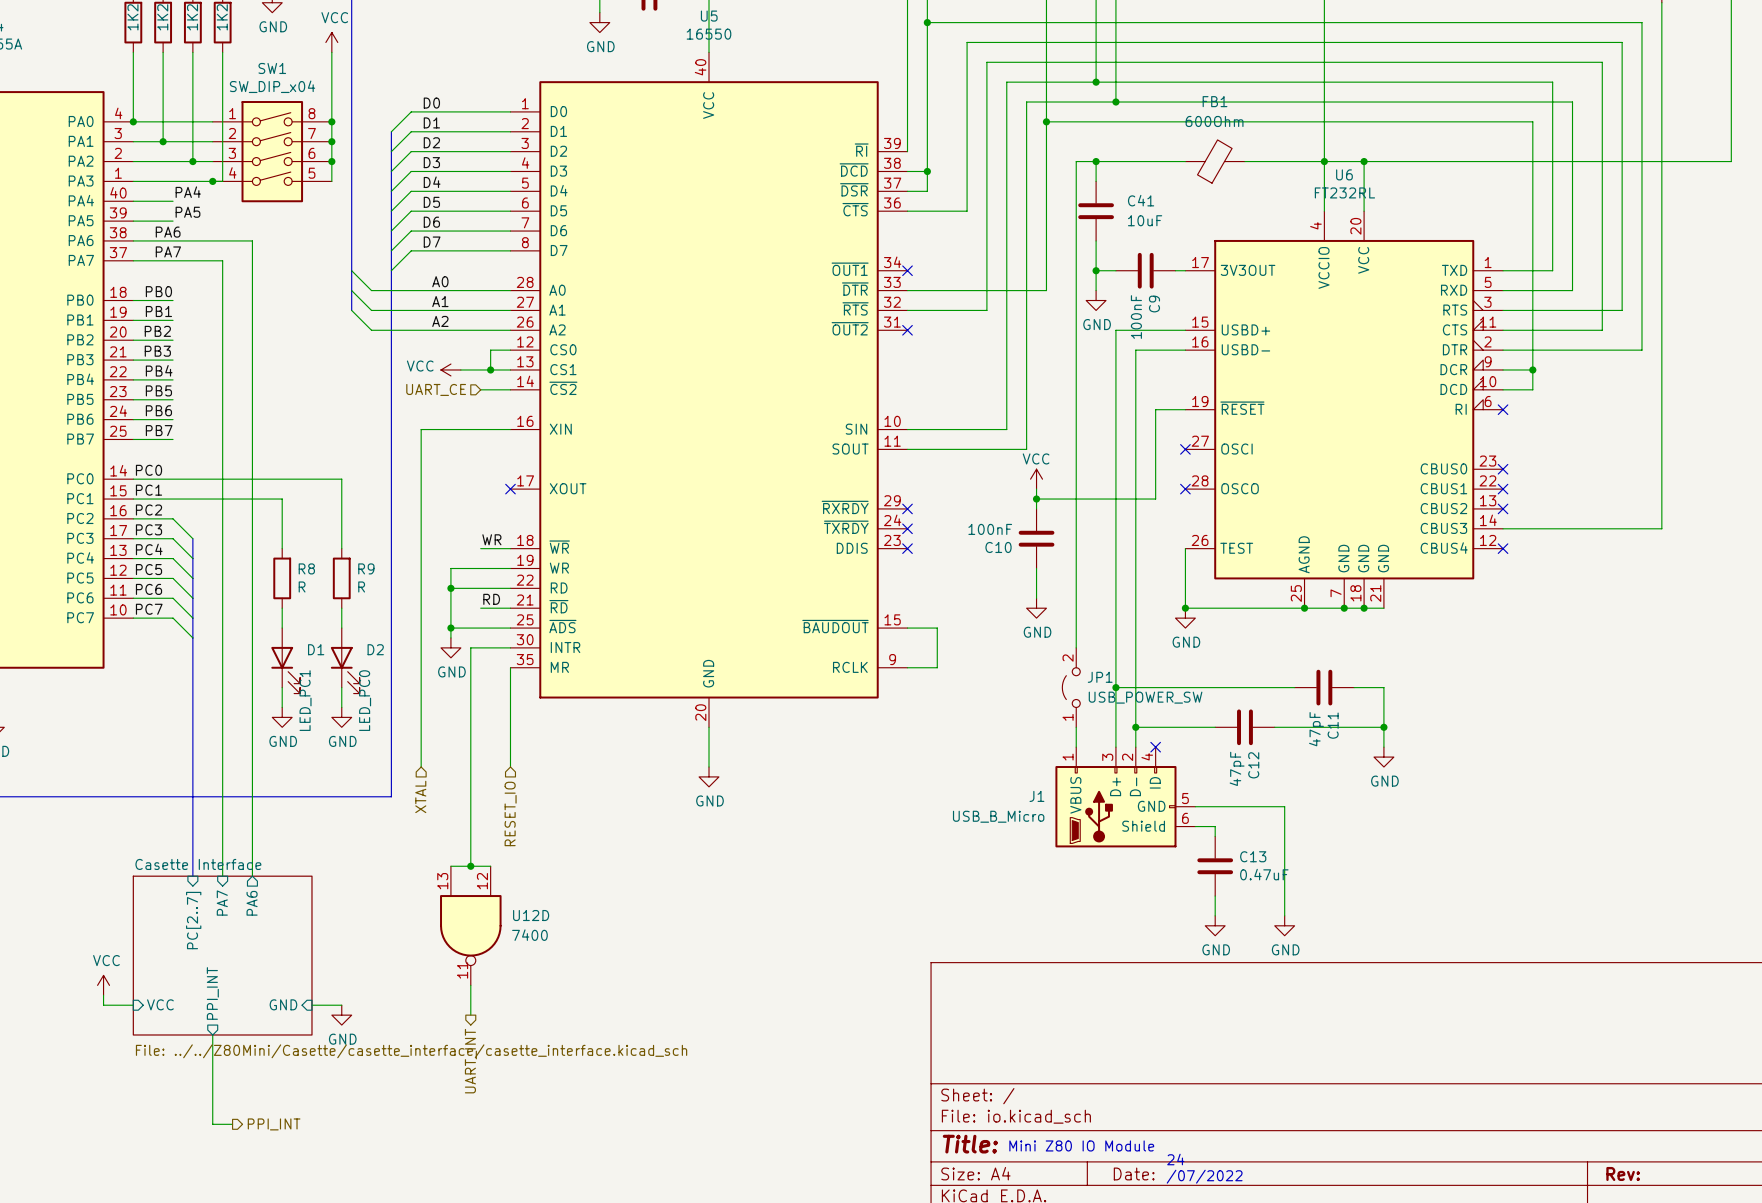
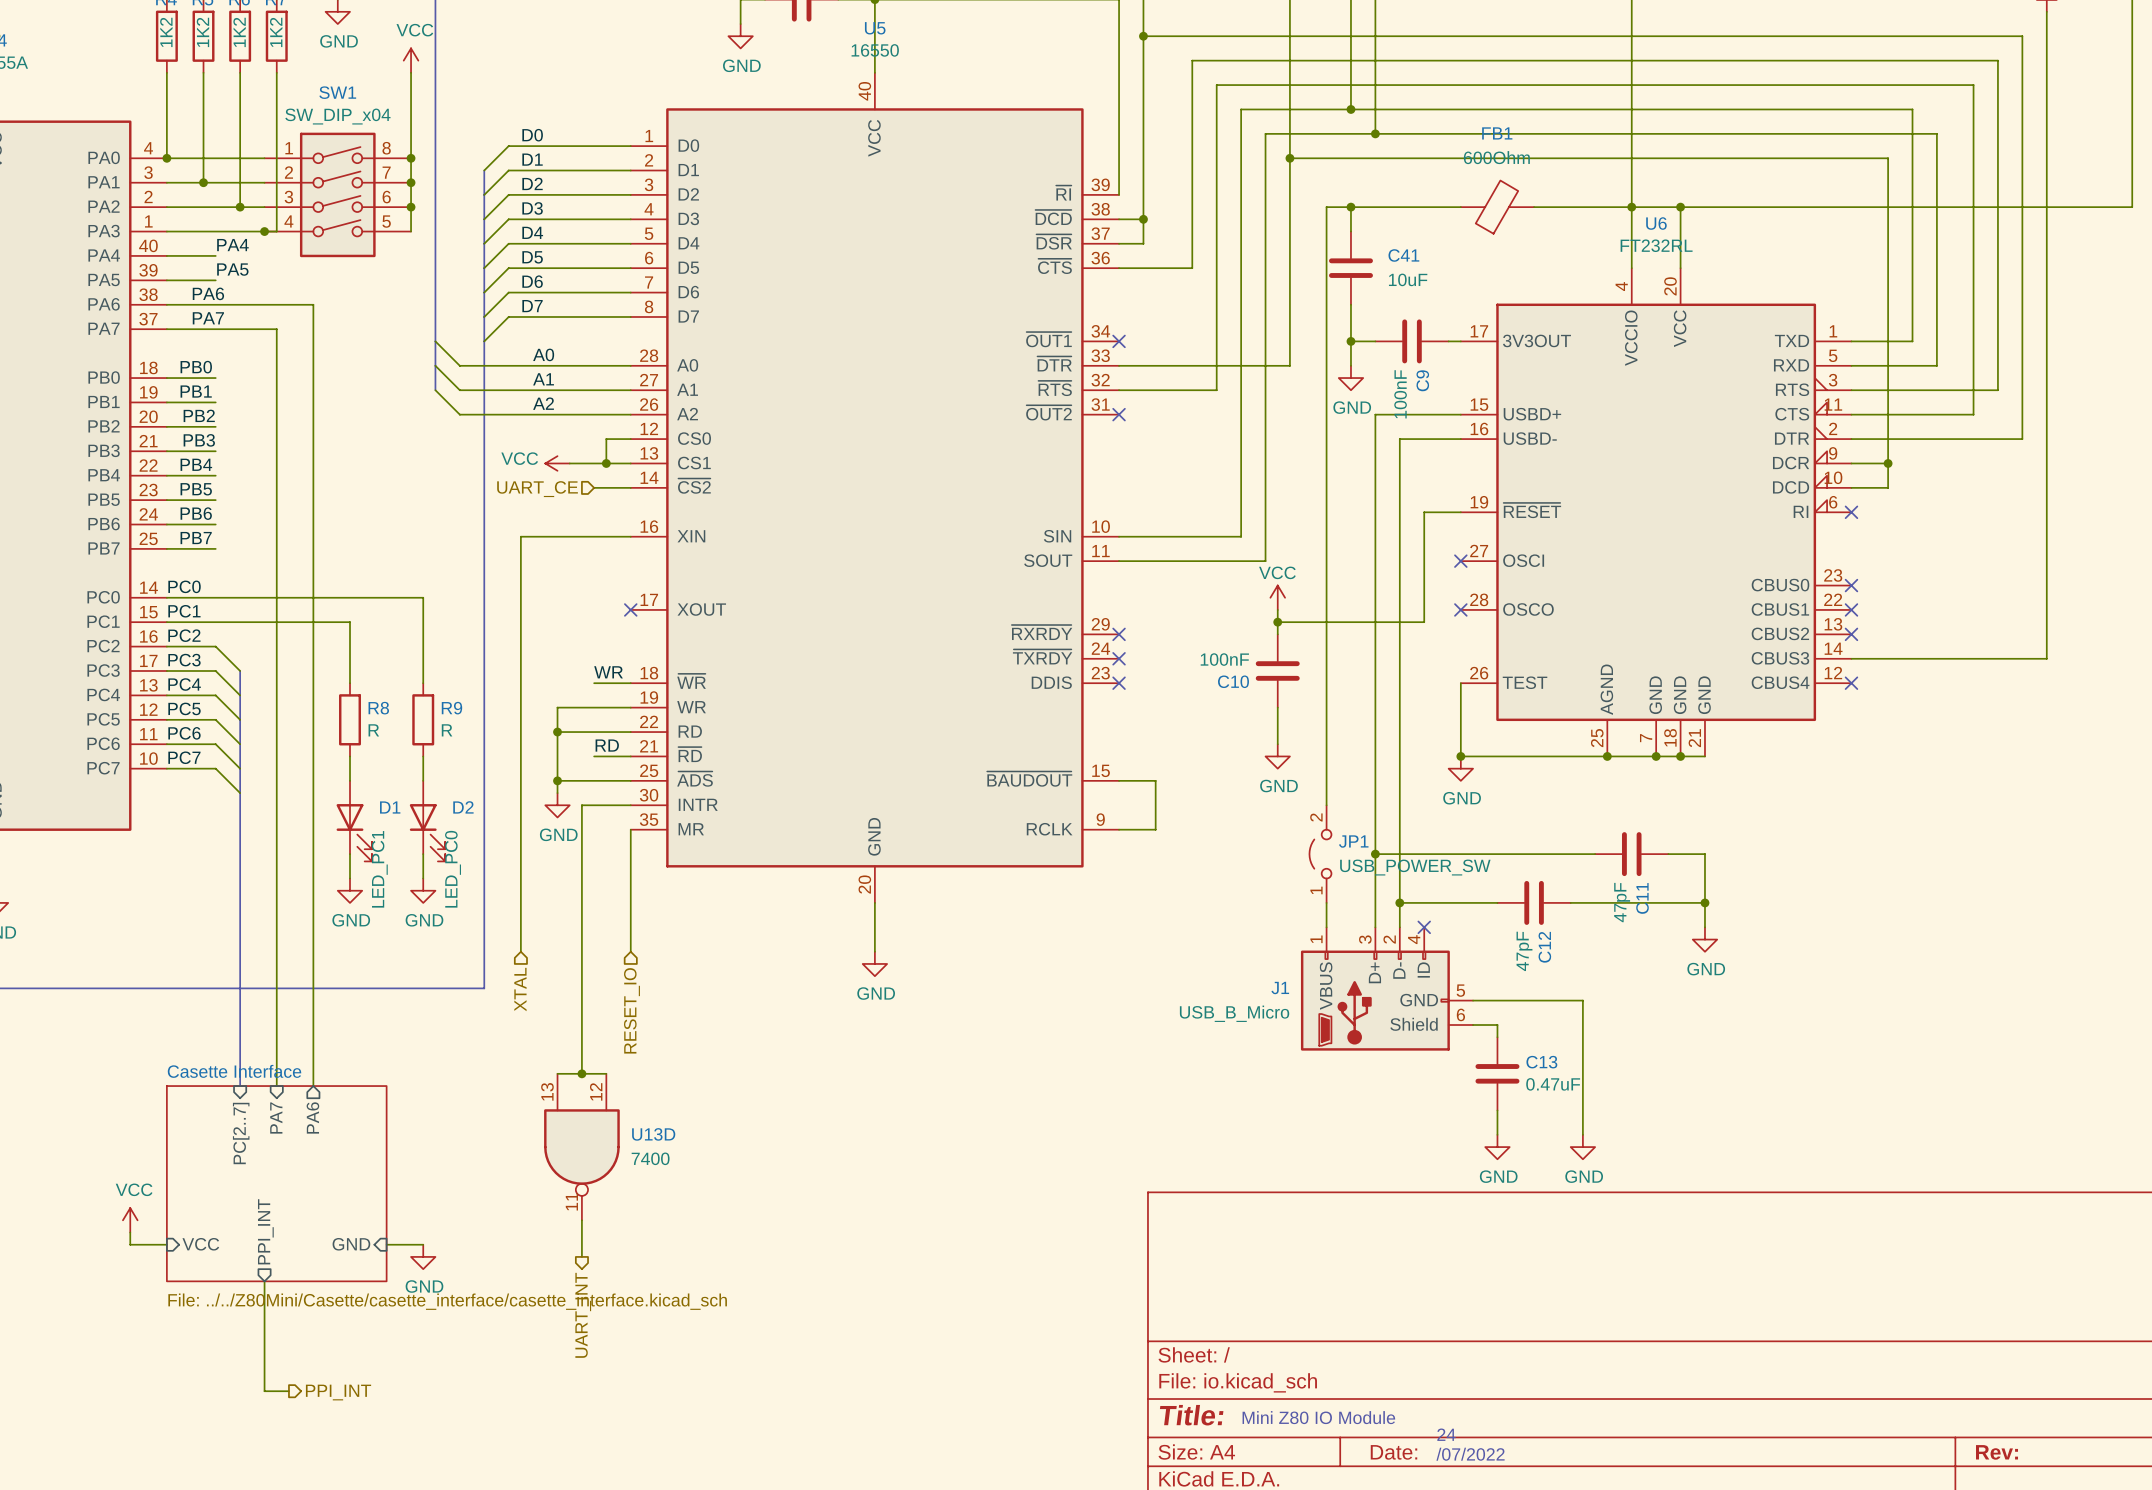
U12D name: U12D (531, 915) -> U13D (653, 1134)

